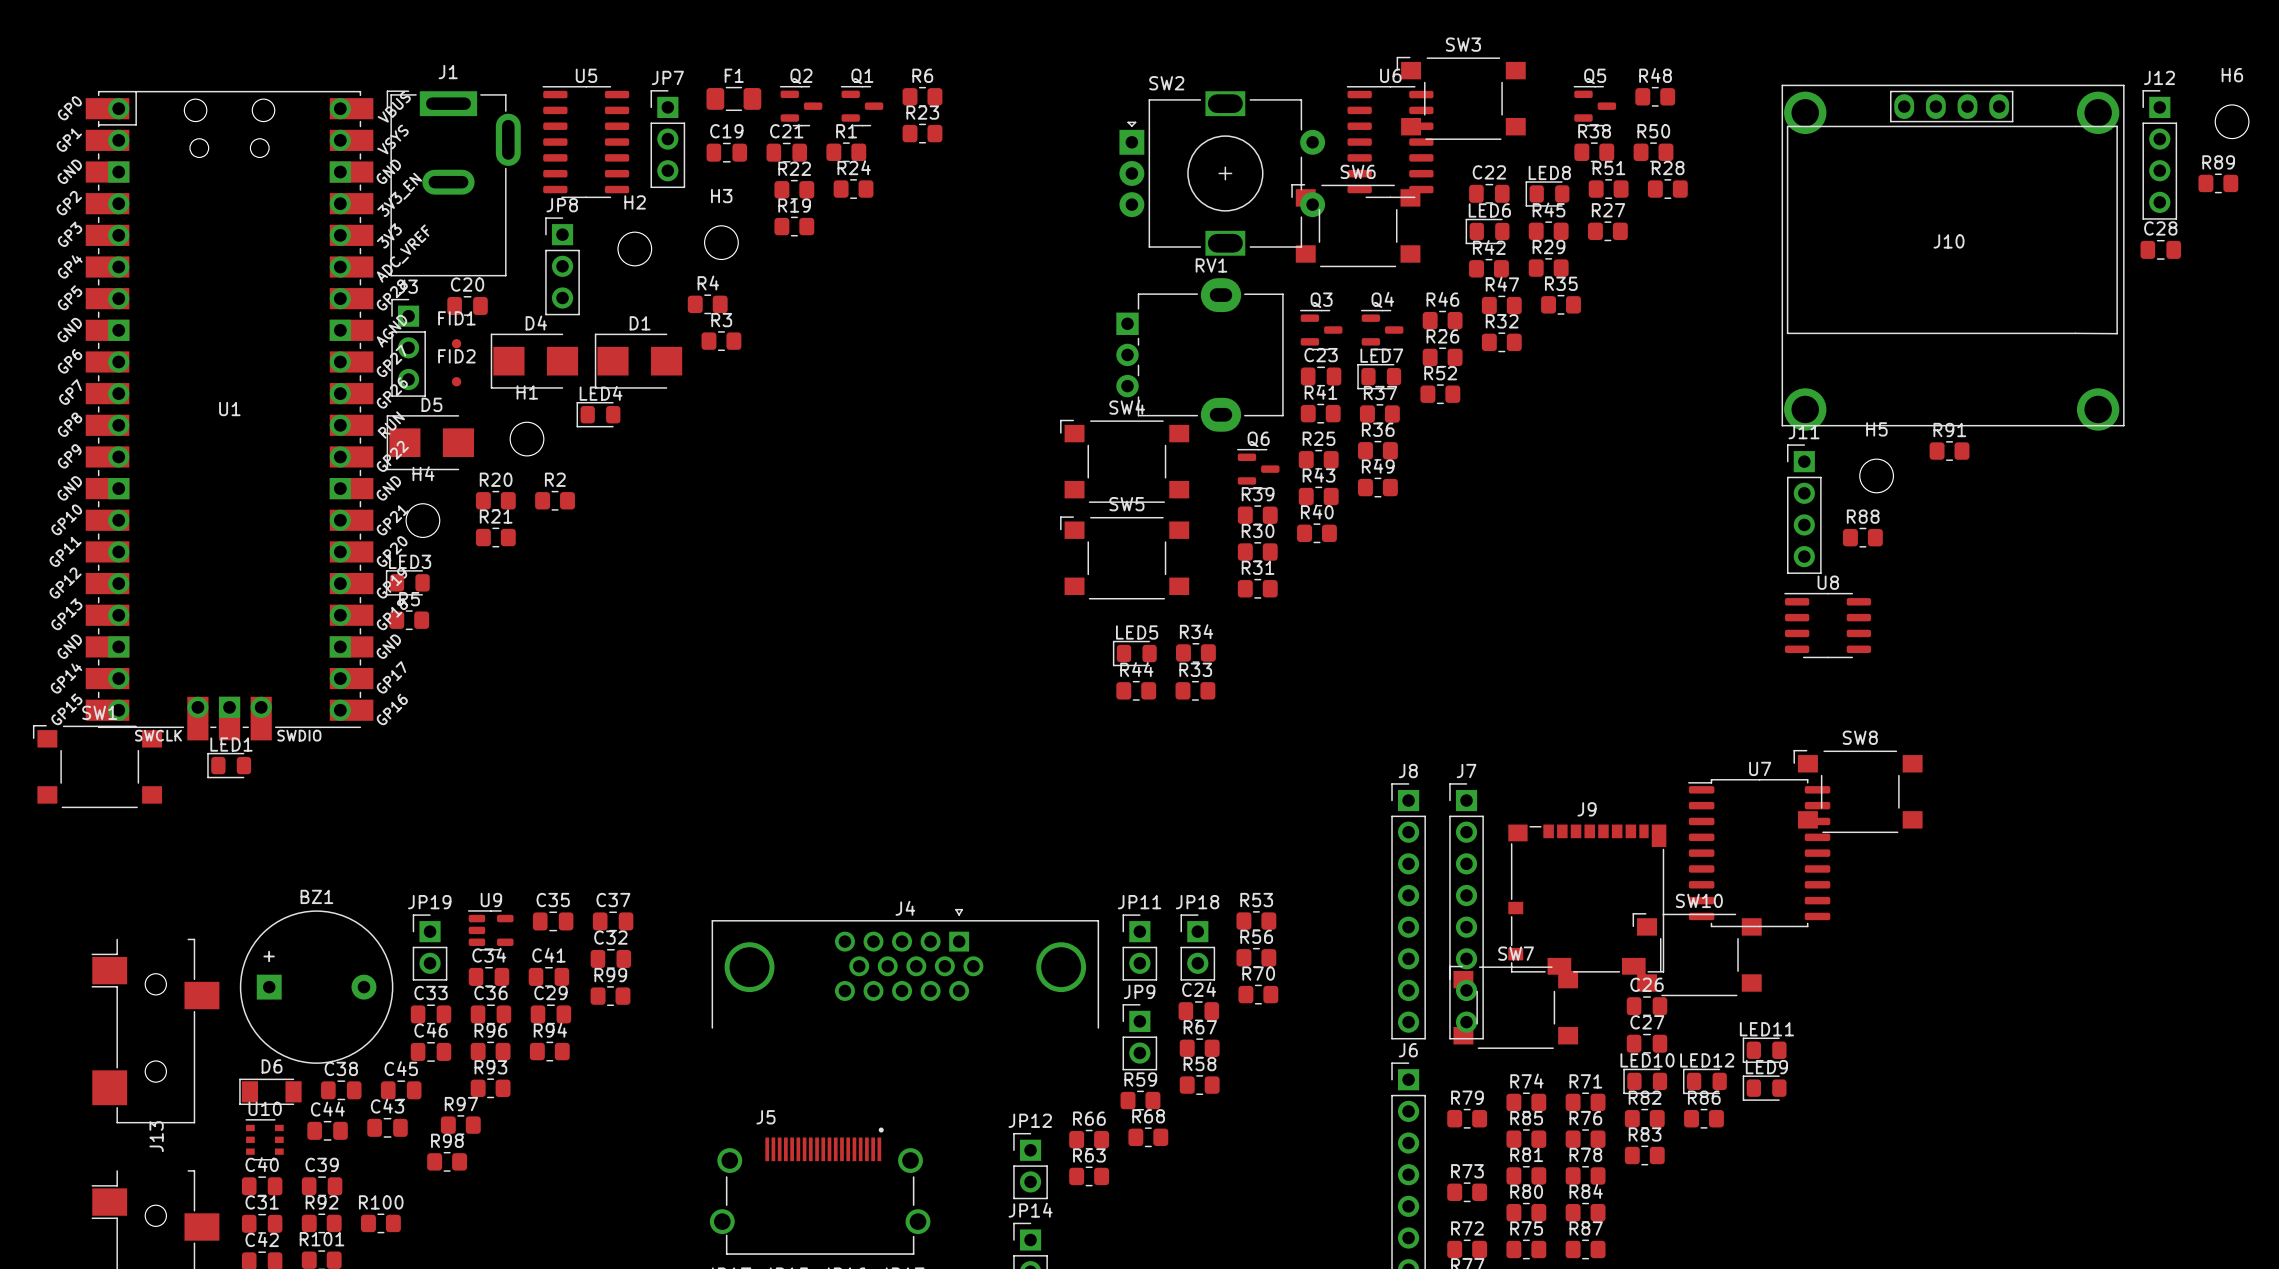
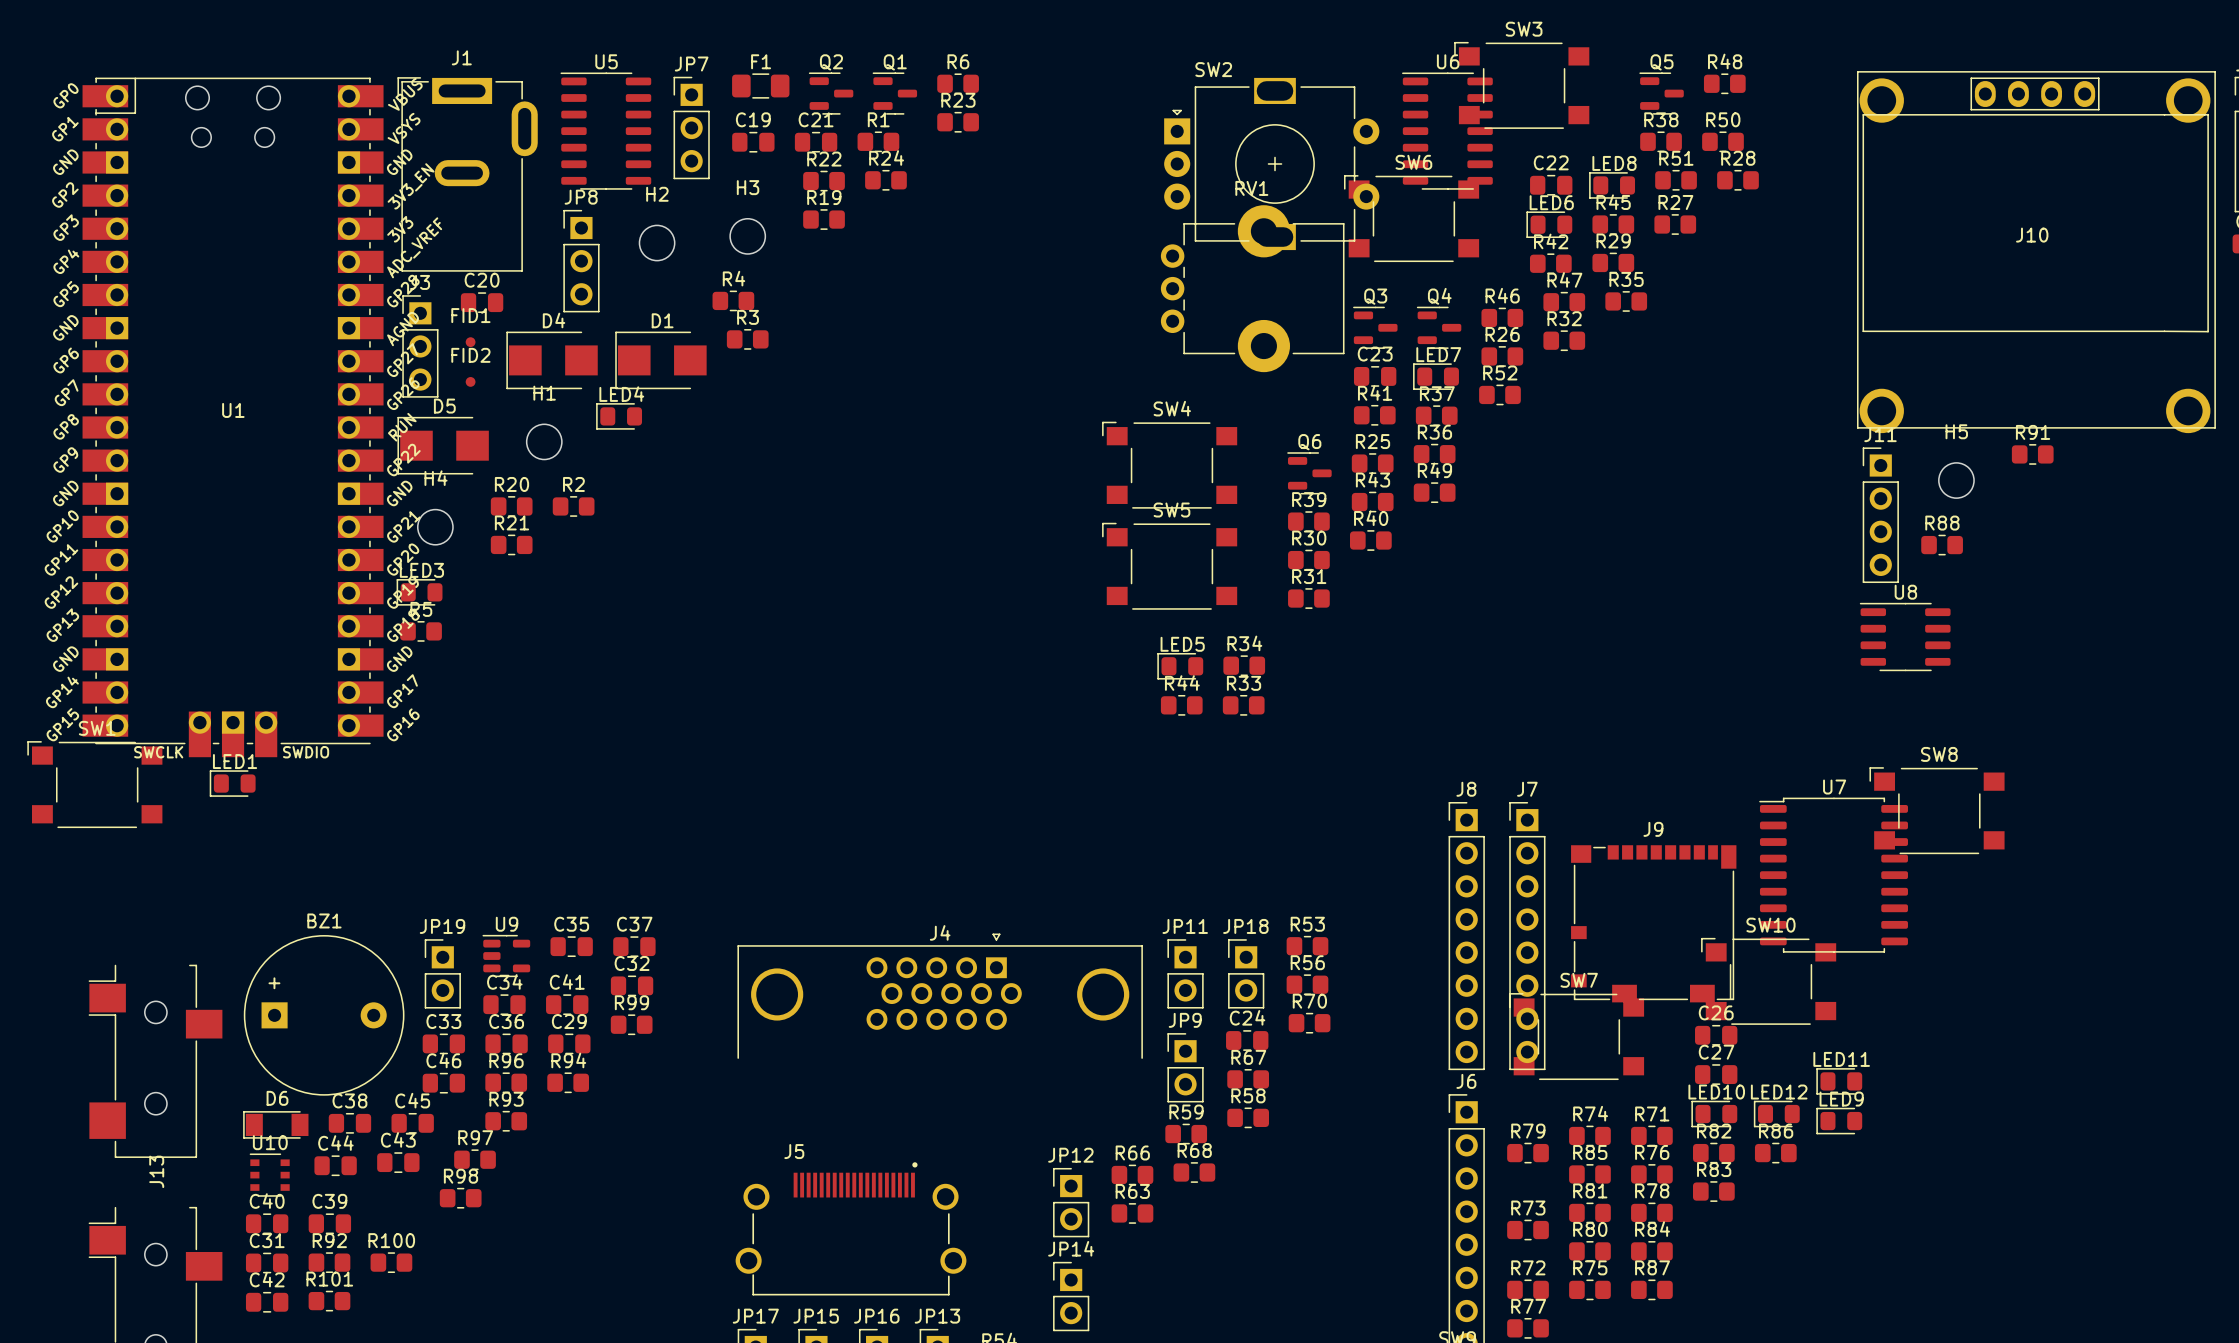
RV1 footprint: [1116, 278, 1284, 432] -> [1160, 205, 1345, 373]

